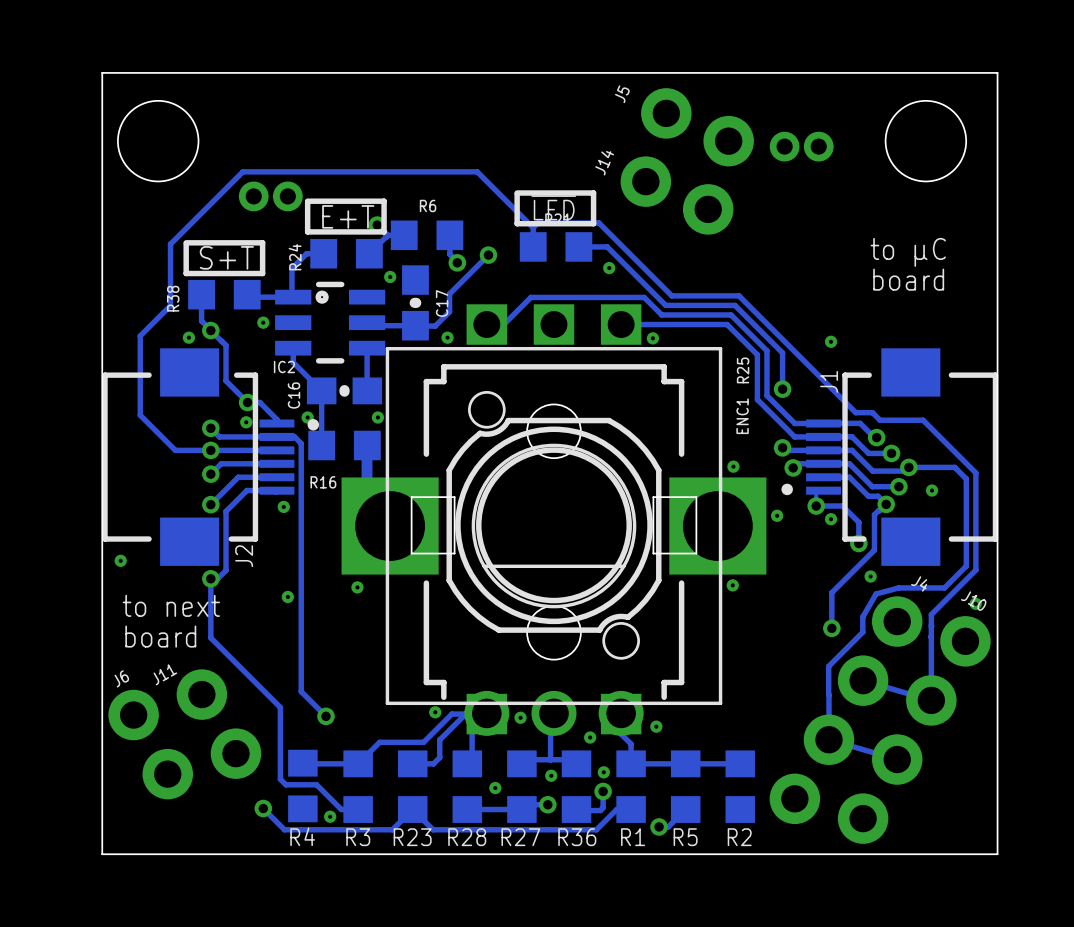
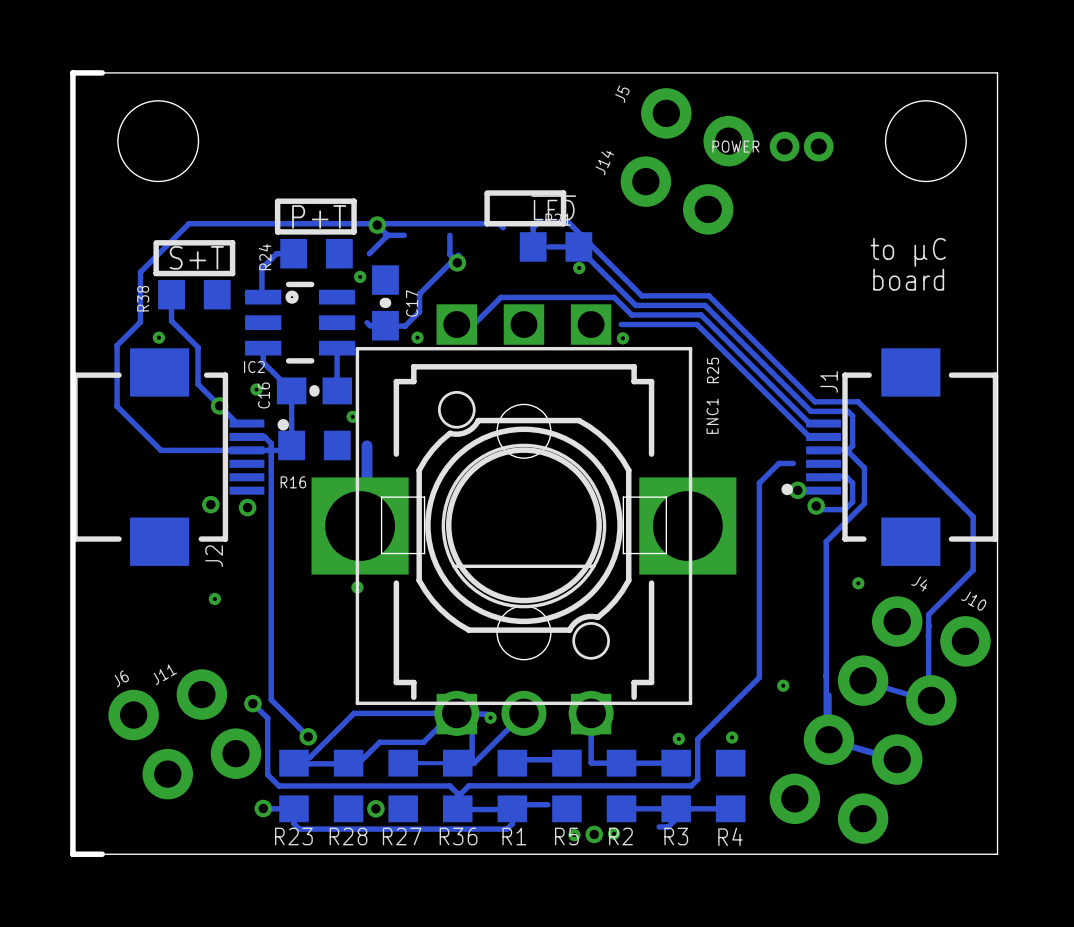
board edge: (102, 72) (102, 854) -> (102, 72) (72, 72) (72, 854) (102, 854)
POWER name: none -> POWER (735, 146)
line: none -> (517, 193) (487, 193)
line: (563, 193) (593, 193) (593, 223) (563, 223) -> (563, 193) (563, 223)
line: (517, 194) (517, 223) -> (487, 194) (487, 223) (517, 223)
part: (270, 196) -> none
line: none -> (307, 201) (277, 201)
line: (354, 201) (384, 201) (384, 231) (354, 231) -> (354, 201) (354, 231)
line: (307, 202) (307, 231) -> (277, 202) (277, 231) (307, 231)
text: E+T (348, 216) -> P+T (319, 216)
track: (569, 223) (599, 223) (671, 295) -> (569, 223) (641, 295) (671, 295)
track: (533, 227) (477, 171) (242, 171) (170, 244) (170, 305) (140, 335) (140, 415) (175, 450) -> (503, 227) (499, 223) (188, 223) (140, 272) (140, 322) (117, 345) (117, 406) (161, 450) (175, 450)
R6: (427, 235) -> none
line: none -> (186, 242) (156, 242)
line: (232, 242) (262, 242) (262, 273) (232, 273) -> (232, 242) (232, 273)
line: (186, 244) (186, 273) -> (156, 244) (156, 273) (186, 273)
track: (578, 246) (607, 246) (665, 305) -> (548, 246) (577, 246) (635, 305) (665, 305)
track: (323, 253) (306, 253) (291, 268) (293, 297) (263, 297) -> (293, 253) (276, 253) (261, 268) (263, 297)
R24 position: (346, 253) -> (316, 253)
track: (488, 255) (449, 294) (449, 311) (435, 326) (415, 326) -> none
via: (488, 255) -> none
text position: S+T (226, 257) -> S+T (196, 257)
via position: (609, 268) -> (579, 268)
via position: (390, 276) -> (360, 276)
track: none -> (171, 294) (171, 321) (198, 347) (198, 384) (237, 423) (246, 423)
track: (201, 294) (201, 321) (226, 345) (226, 380) (247, 402) (259, 402) (276, 419) (276, 423) -> none
R38 position: (224, 294) -> (194, 294)
track: (708, 295) (739, 295) (855, 412) (872, 412) (880, 420) (923, 420) (975, 472) (975, 570) (931, 614) (931, 700) (863, 680) -> (708, 295) (814, 401) (858, 401) (973, 516) (973, 570) (928, 614) (928, 700) (860, 680)
track: (530, 297) (503, 324) (486, 324) -> (530, 297) (500, 297) (473, 324) (456, 324)
track: (614, 297) (644, 297) (661, 314) -> (614, 297) (631, 314) (661, 314)
C17 position: (415, 302) -> (385, 302)
track: (705, 305) (735, 305) (782, 352) (782, 389) -> (705, 305) (810, 411) (847, 411) (852, 415) (852, 445) (848, 449) (828, 450)
track: (701, 314) (731, 314) (766, 350) (766, 395) (794, 423) (860, 423) (876, 437) -> (701, 314) (809, 422) (828, 423)
via: (263, 322) -> none
IC2 position: (330, 322) -> (300, 322)
track: (697, 324) (727, 324) (757, 354) (757, 399) (794, 436) (852, 436) (868, 453) (891, 453) -> (697, 324) (808, 436) (828, 436)
track: (415, 325) (385, 325) -> (458, 255) (419, 294) (419, 311) (405, 326) (385, 326)
via: (210, 330) -> none
via position: (188, 337) -> (158, 337)
via position: (447, 337) -> (417, 337)
via position: (652, 338) -> (622, 338)
via: (831, 341) -> none
track: (293, 348) (293, 362) (321, 390) (321, 445) -> (263, 348) (263, 362) (291, 390) (291, 445)
track: (367, 348) (367, 390) -> (337, 348) (337, 390)
via: (782, 389) -> none
C16 position: (344, 390) -> (314, 390)
via position: (247, 402) -> (256, 389)
via: none -> (219, 405)
via: none -> (352, 416)
via: (307, 417) -> none
via: (377, 417) -> none
via: (246, 422) -> none
track: (210, 428) (219, 436) (276, 436) -> none
via: (210, 428) -> none
track: none -> (247, 436) (264, 436) (271, 443) (271, 699) (308, 736)
track: (277, 436) (294, 436) (301, 443) (301, 691) (326, 716) -> none
via: (876, 437) -> none
R16 position: (344, 445) -> (314, 445)
track: (782, 447) (785, 450) (852, 450) (872, 471) (905, 471) (908, 467) (954, 467) (966, 478) (966, 566) (944, 587) (898, 587) (876, 594) (862, 617) (862, 632) (828, 666) (828, 694) -> none
via: (782, 447) -> none
track: none -> (846, 449) (864, 468) (864, 503) (826, 541) (826, 739) (894, 759)
via: (210, 450) -> none
via: (891, 453) -> none
J2 position: (210, 457) -> (180, 457)
track: (276, 463) (221, 463) (210, 474) -> none
track: none -> (793, 463) (778, 463) (759, 483) (759, 677) (697, 739) (697, 779) (691, 785) (468, 785) (457, 796)
via: (733, 466) -> none
track: (793, 467) (797, 463) (849, 463) (872, 486) (898, 486) -> none
via: (793, 467) -> none
via: (908, 467) -> none
via: (210, 474) -> none
track: (276, 477) (238, 477) (210, 504) -> none
track: (823, 477) (849, 477) (868, 496) (878, 496) (886, 504) (874, 514) (874, 550) (831, 592) (831, 628) -> none
track: none -> (828, 477) (845, 476) (852, 483) (852, 501) (844, 509) (813, 509)
via: (898, 486) -> none
track: (276, 490) (246, 490) (226, 511) (226, 570) (217, 578) (210, 578) (210, 637) (280, 707) (280, 779) (285, 784) (316, 784) (341, 809) (358, 809) -> none
via: none -> (797, 490)
track: (823, 490) (816, 490) (816, 506) (842, 506) (858, 522) (858, 543) -> none
via: (932, 490) -> none
via: (886, 504) -> none
via: (283, 506) -> none
via: none -> (247, 507)
via: (777, 515) -> none
ENC1 position: (553, 519) -> (523, 519)
via: (831, 519) -> none
via: (858, 543) -> none
R25 position: (553, 550) -> (523, 550)
via: (120, 560) -> none
via position: (870, 576) -> (858, 583)
via: (210, 578) -> none
via: (732, 585) -> none
via: (287, 596) -> none
via: none -> (214, 599)
via: (975, 603) -> none
text: to next (171, 605) -> none
via: (831, 628) -> none
text: board (160, 636) -> none
via: none -> (783, 685)
via: none -> (252, 703)
track: none -> (253, 703) (267, 718) (267, 774) (278, 786) (449, 786) (457, 793) (457, 808)
via: (435, 712) -> none
track: none -> (456, 713) (354, 713) (309, 757) (299, 757) (294, 763)
track: (486, 713) (466, 713) (439, 740) (439, 757) (433, 763) (412, 763) -> none
track: none -> (523, 713) (474, 763) (403, 763)
track: (553, 713) (550, 716) (550, 759) -> none
track: none -> (591, 714) (591, 763) (676, 763)
track: (621, 714) (621, 734) (631, 744) (631, 763) (740, 763) -> none
via position: (326, 716) -> (308, 736)
via: none -> (490, 717)
via: (520, 717) -> none
via position: (656, 726) -> (678, 738)
via: (590, 737) -> none
via: none -> (732, 737)
via: (603, 772) -> none
via: (551, 775) -> none
R4 position: (302, 786) -> (730, 786)
R3 position: (358, 786) -> (676, 786)
R23 position: (412, 786) -> (294, 786)
R28 position: (467, 786) -> (348, 786)
R27 position: (521, 786) -> (403, 786)
R36 position: (576, 786) -> (457, 786)
R1 position: (631, 786) -> (512, 786)
R5 position: (685, 786) -> (566, 786)
R2 position: (740, 786) -> (621, 786)
via: (495, 788) -> none
track: (603, 791) (603, 807) (600, 810) (576, 809) -> none
via: (603, 791) -> none
via: (547, 804) -> none
track: (263, 808) (284, 829) (392, 829) (412, 809) (432, 829) (596, 829) (616, 809) (631, 809) -> none
via: none -> (375, 808)
track: none -> (512, 808) (512, 823) (507, 829) (299, 829) (294, 823) (294, 808) (269, 808)
track: none -> (730, 808) (621, 808)
via: (330, 816) -> none
via: (659, 826) -> none
via: none -> (614, 833)
via: none -> (594, 834)
via: none -> (574, 835)

